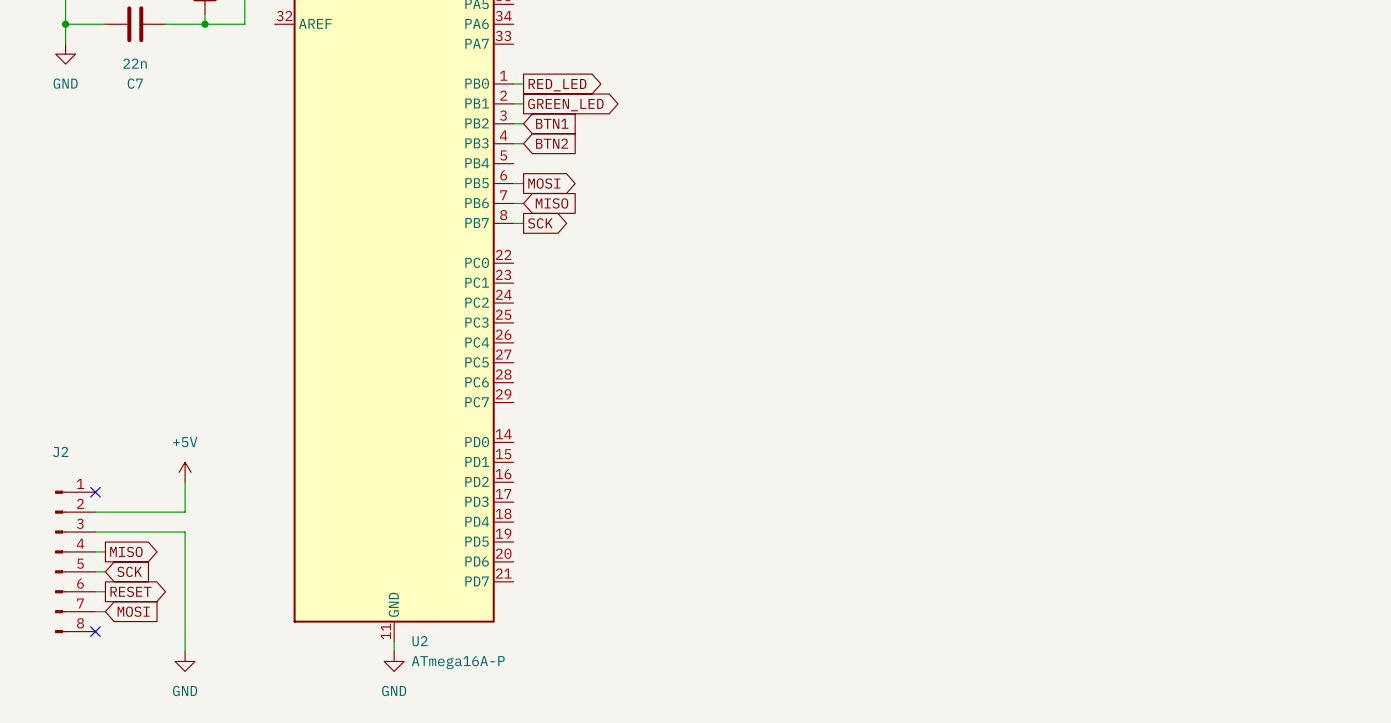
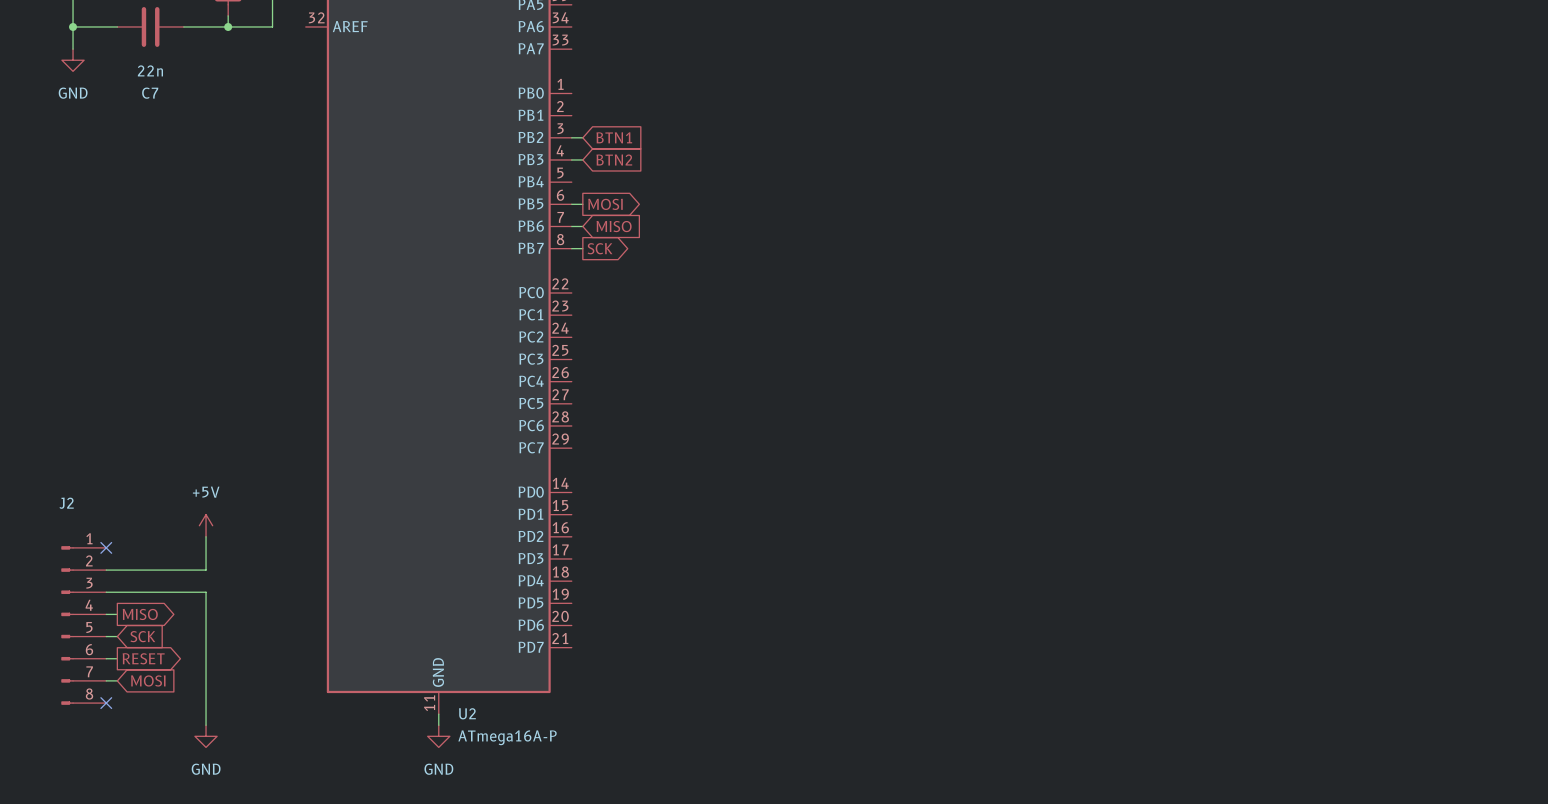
wire: (513, 83) (523, 83) -> none
global label: RED_LED (557, 85) -> none
wire: (513, 103) (523, 103) -> none
global label: GREEN_LED (565, 105) -> none

